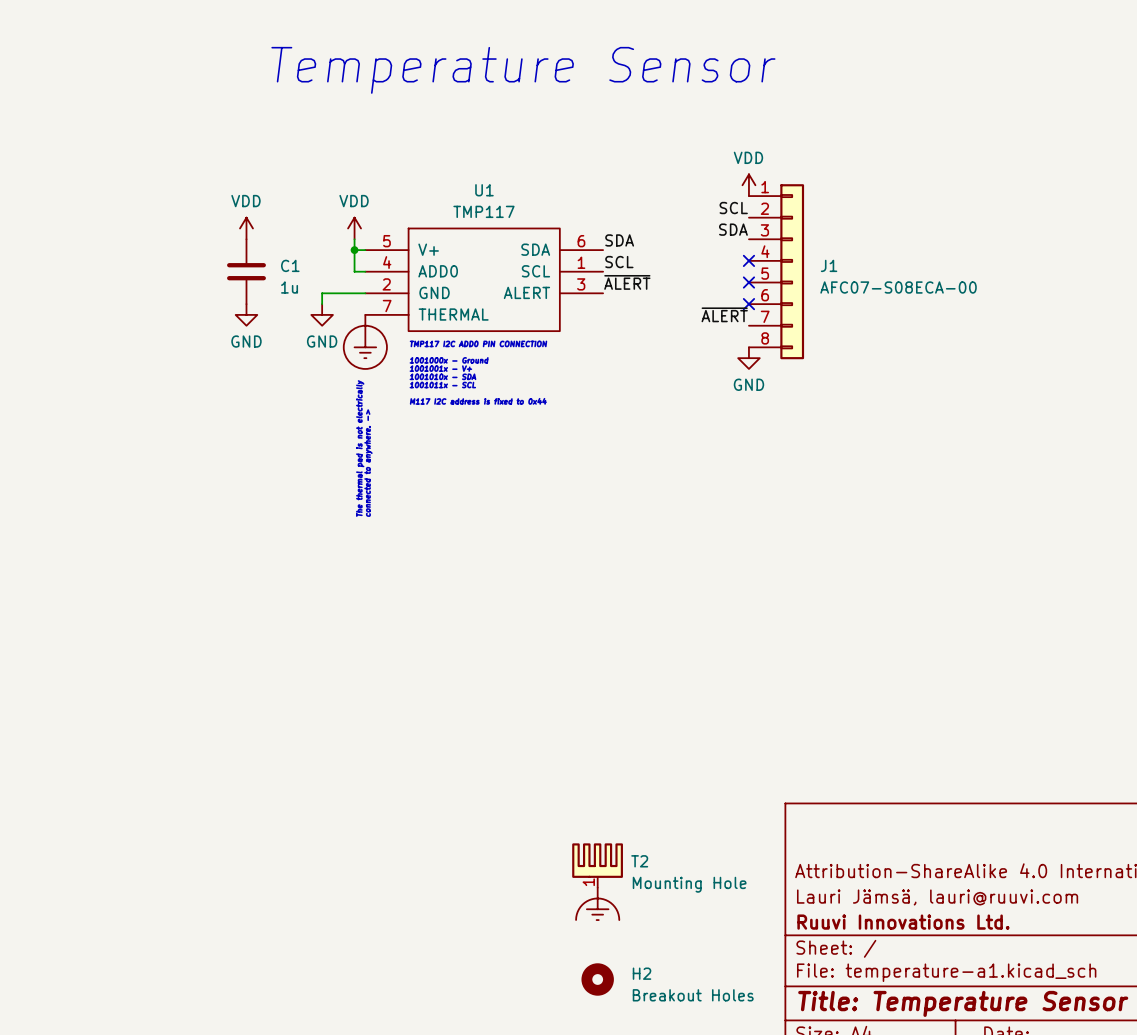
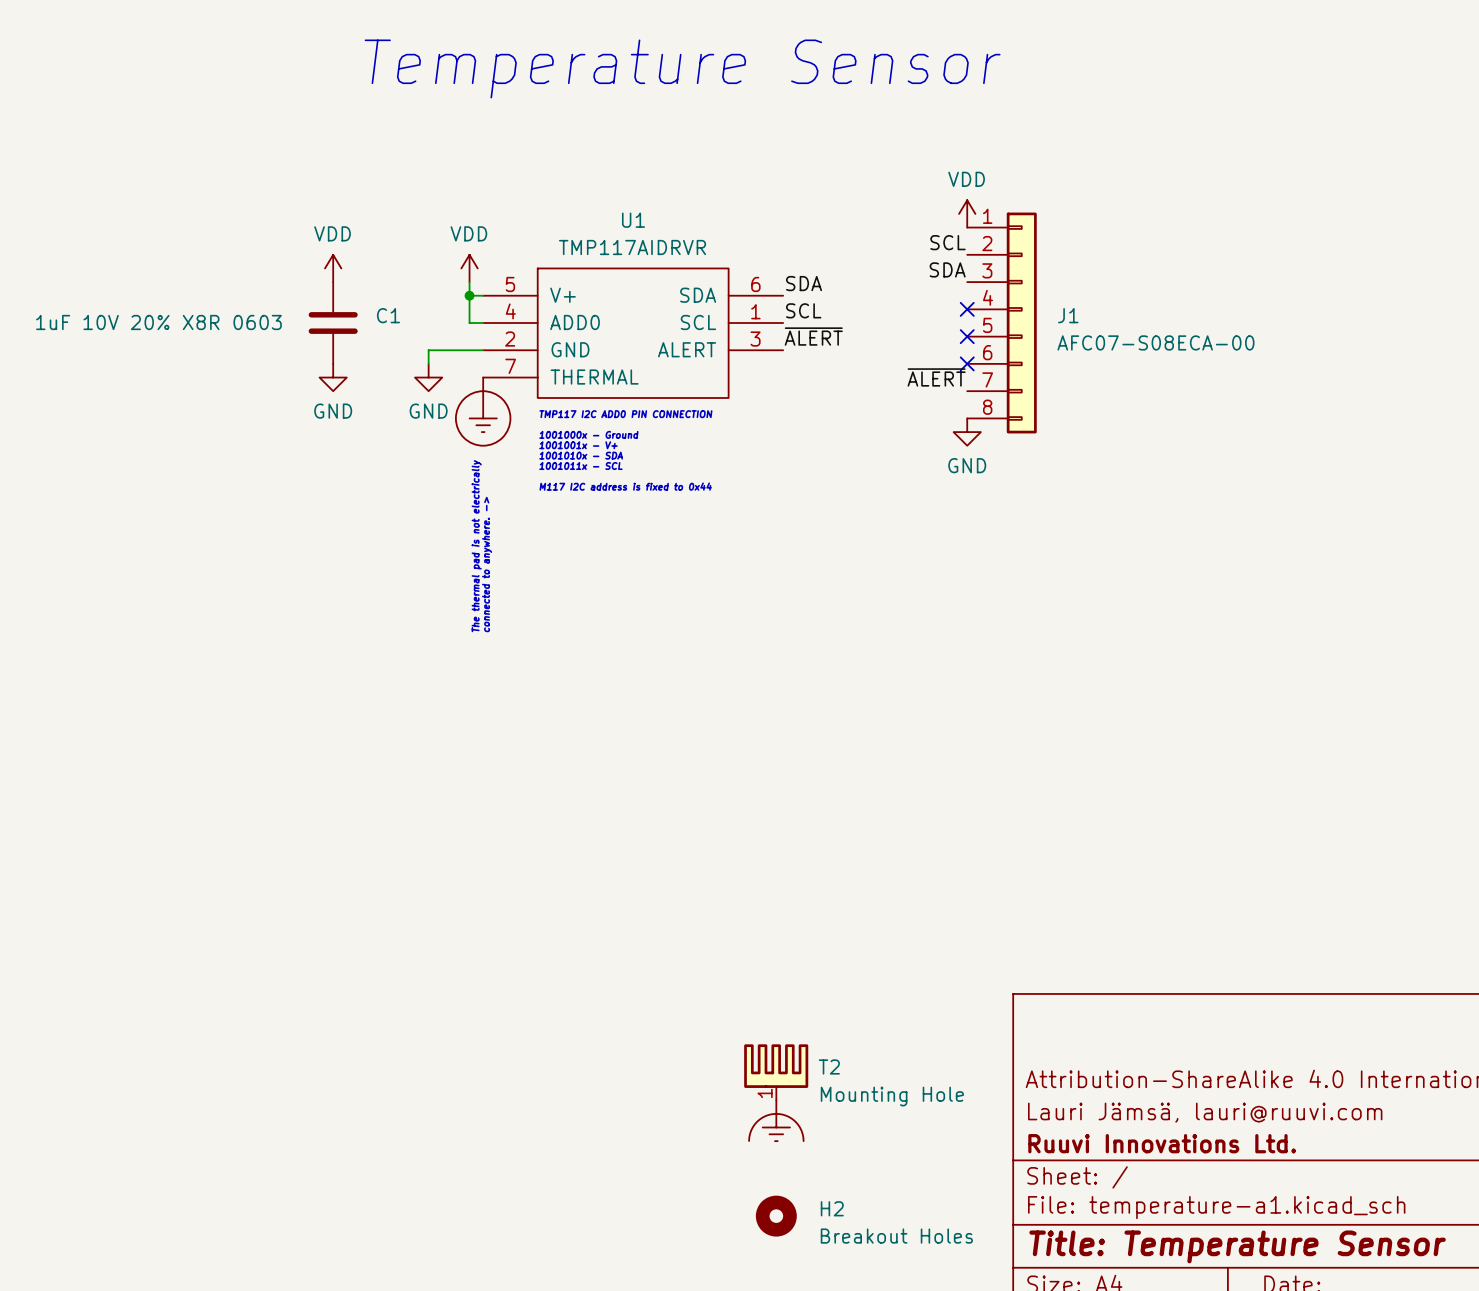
U1 value: TMP117 (483, 211) -> TMP117AIDRVR (632, 247)
C1 value: 1u (289, 287) -> 1uF 10V 20% X8R 0603 (158, 322)

